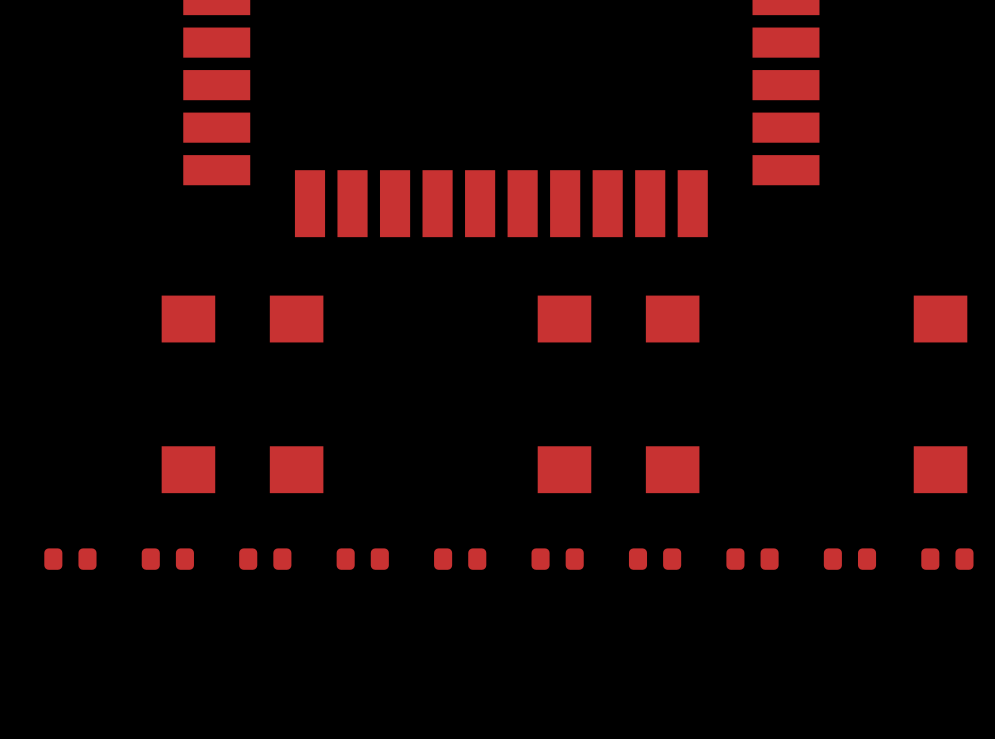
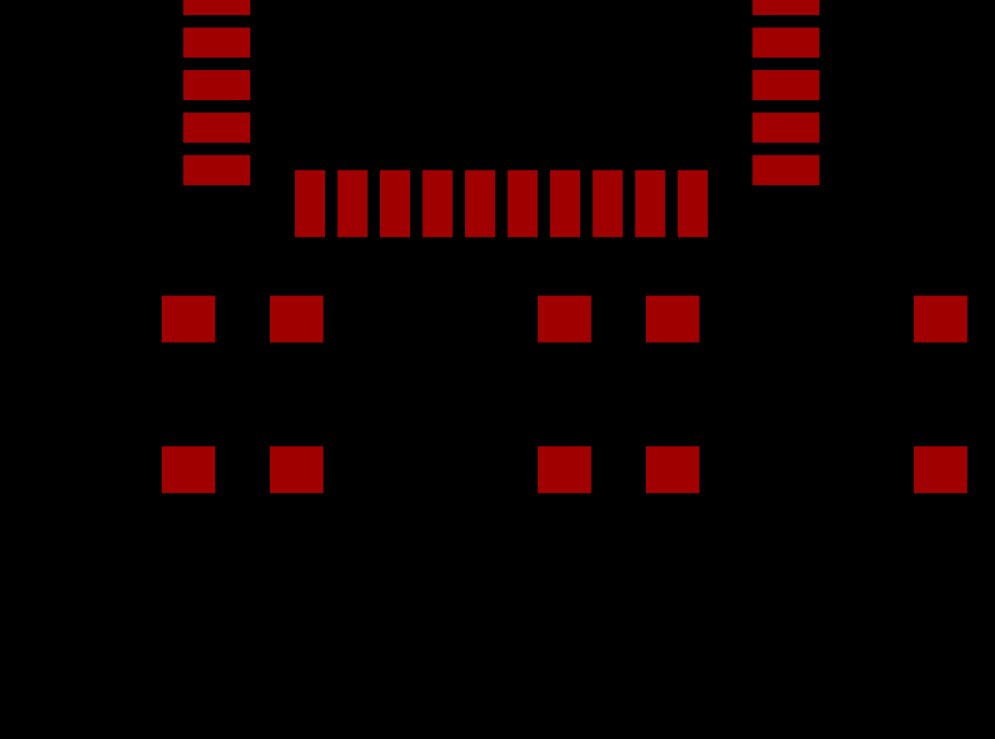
part: (70, 559) -> none
part: (167, 559) -> none
part: (265, 559) -> none
part: (362, 559) -> none
part: (460, 559) -> none
part: (557, 559) -> none
part: (655, 559) -> none
part: (752, 559) -> none
part: (849, 559) -> none
part: (947, 559) -> none

